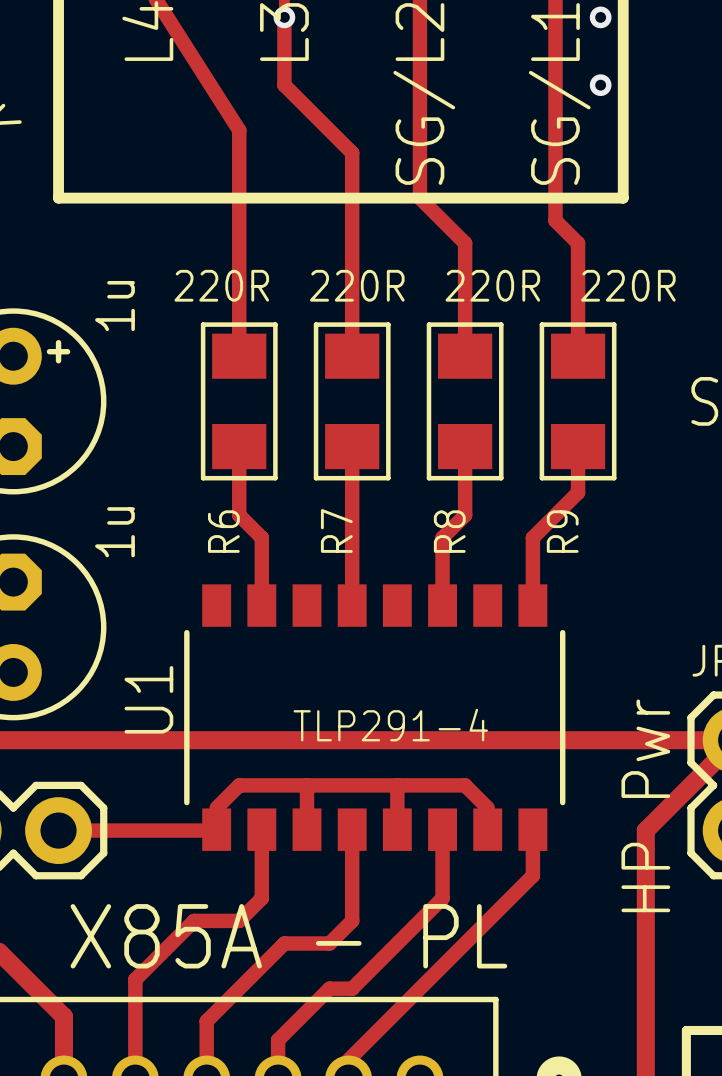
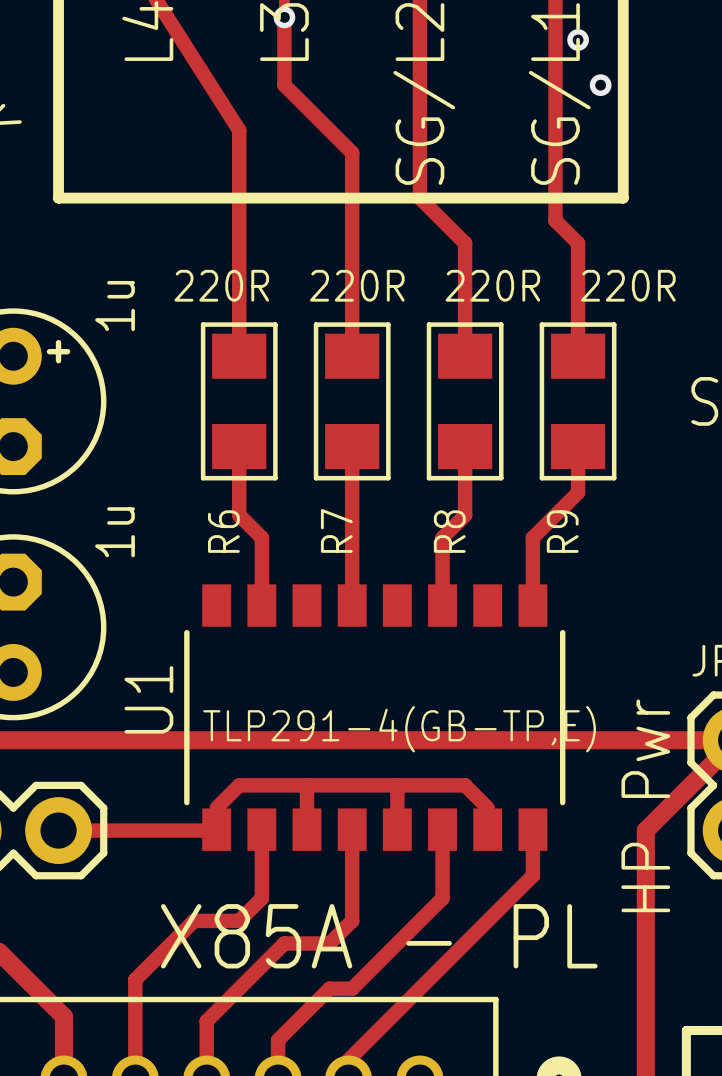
via position: (600, 17) -> (578, 39)
U1 value: TLP291-4 (390, 725) -> TLP291-4(GB-TP,E) (399, 729)
part value position: X85A - PL (288, 936) -> X85A - PL (379, 936)

